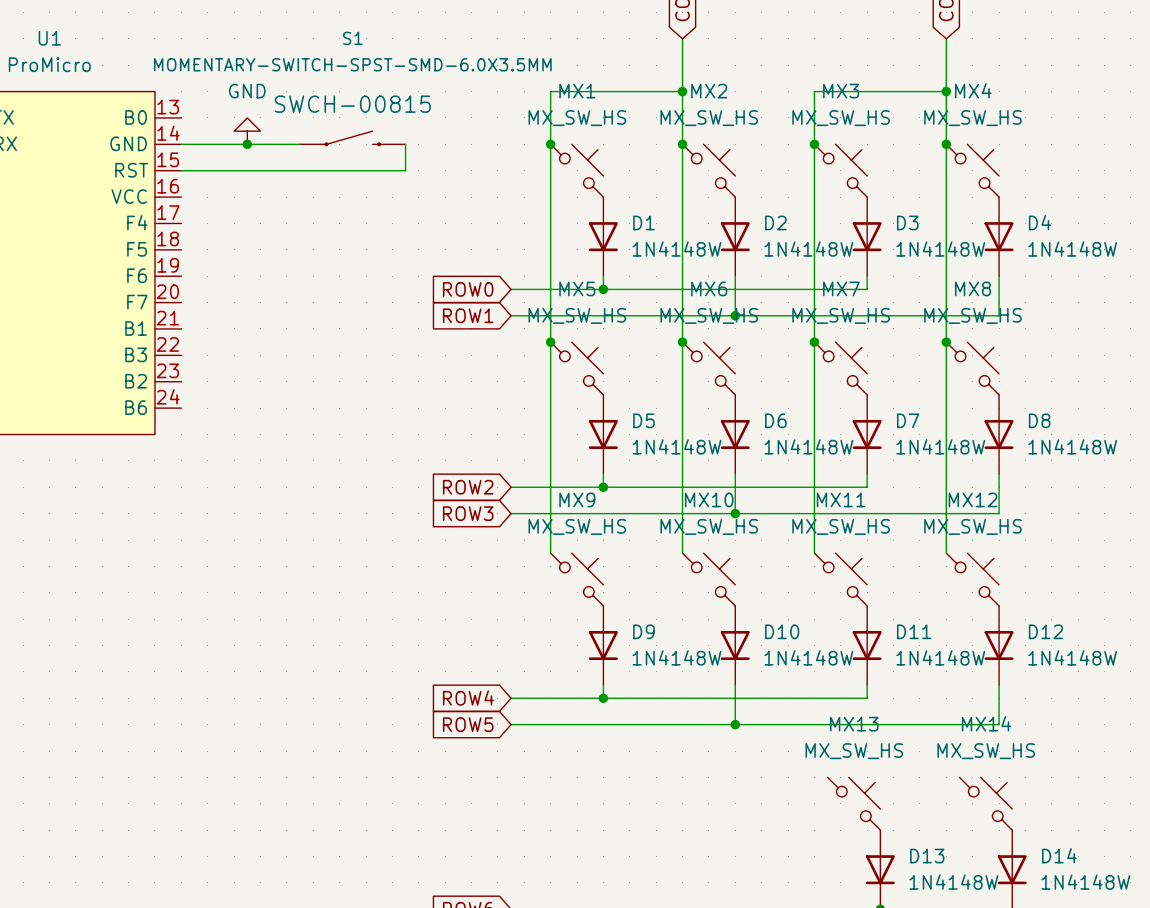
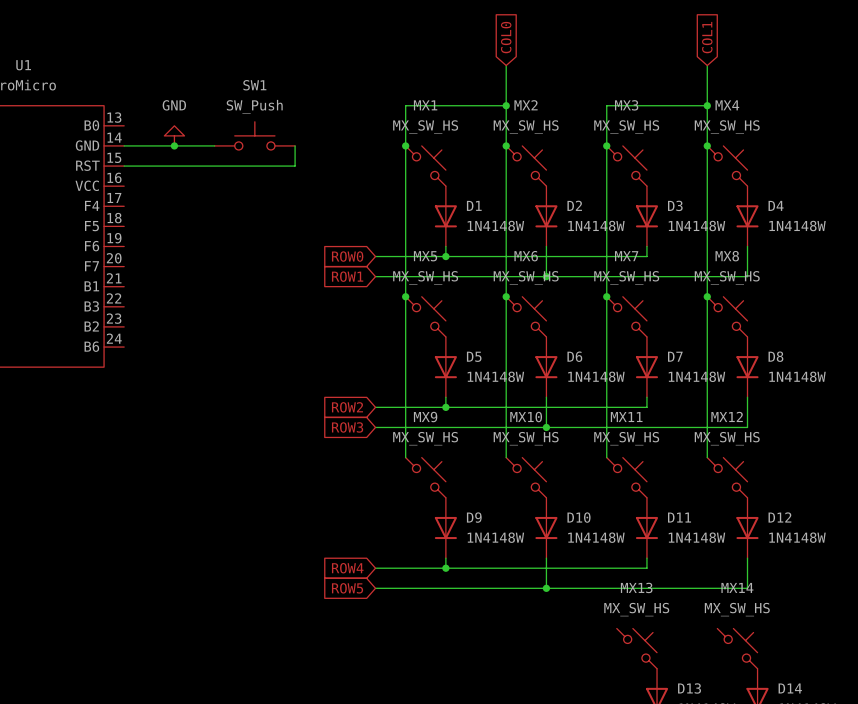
SW1: none -> SW_Push (254, 135)
S1: MOMENTARY-SWITCH-SPST-SMD-6.0X3.5MM (352, 138) -> none

